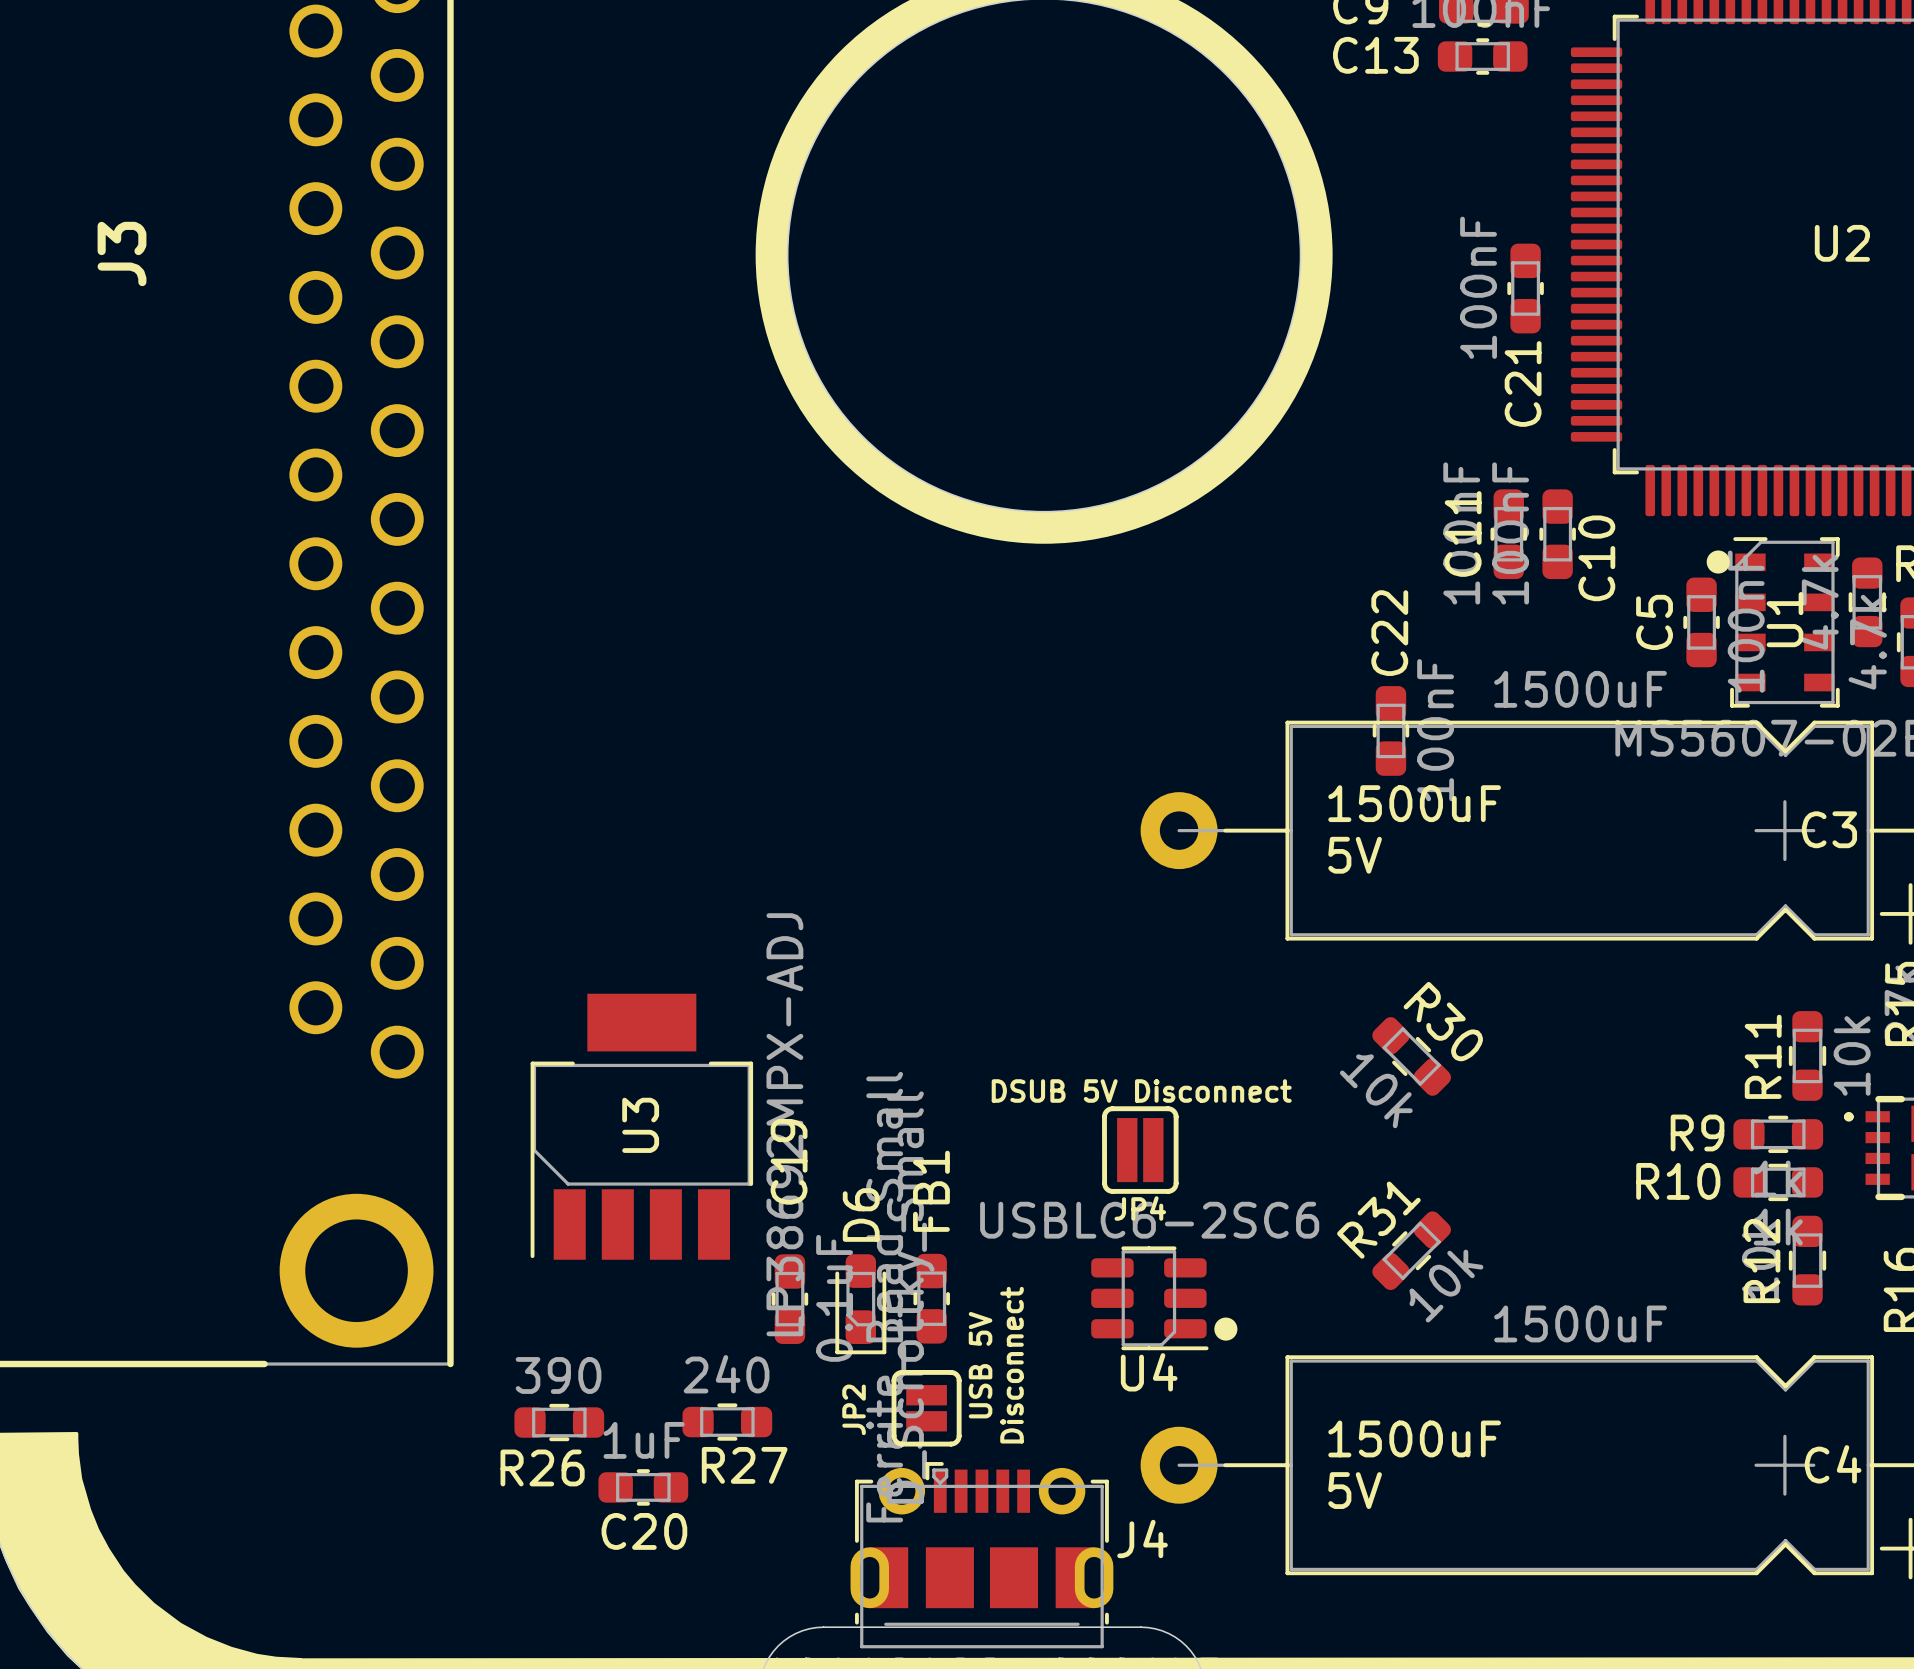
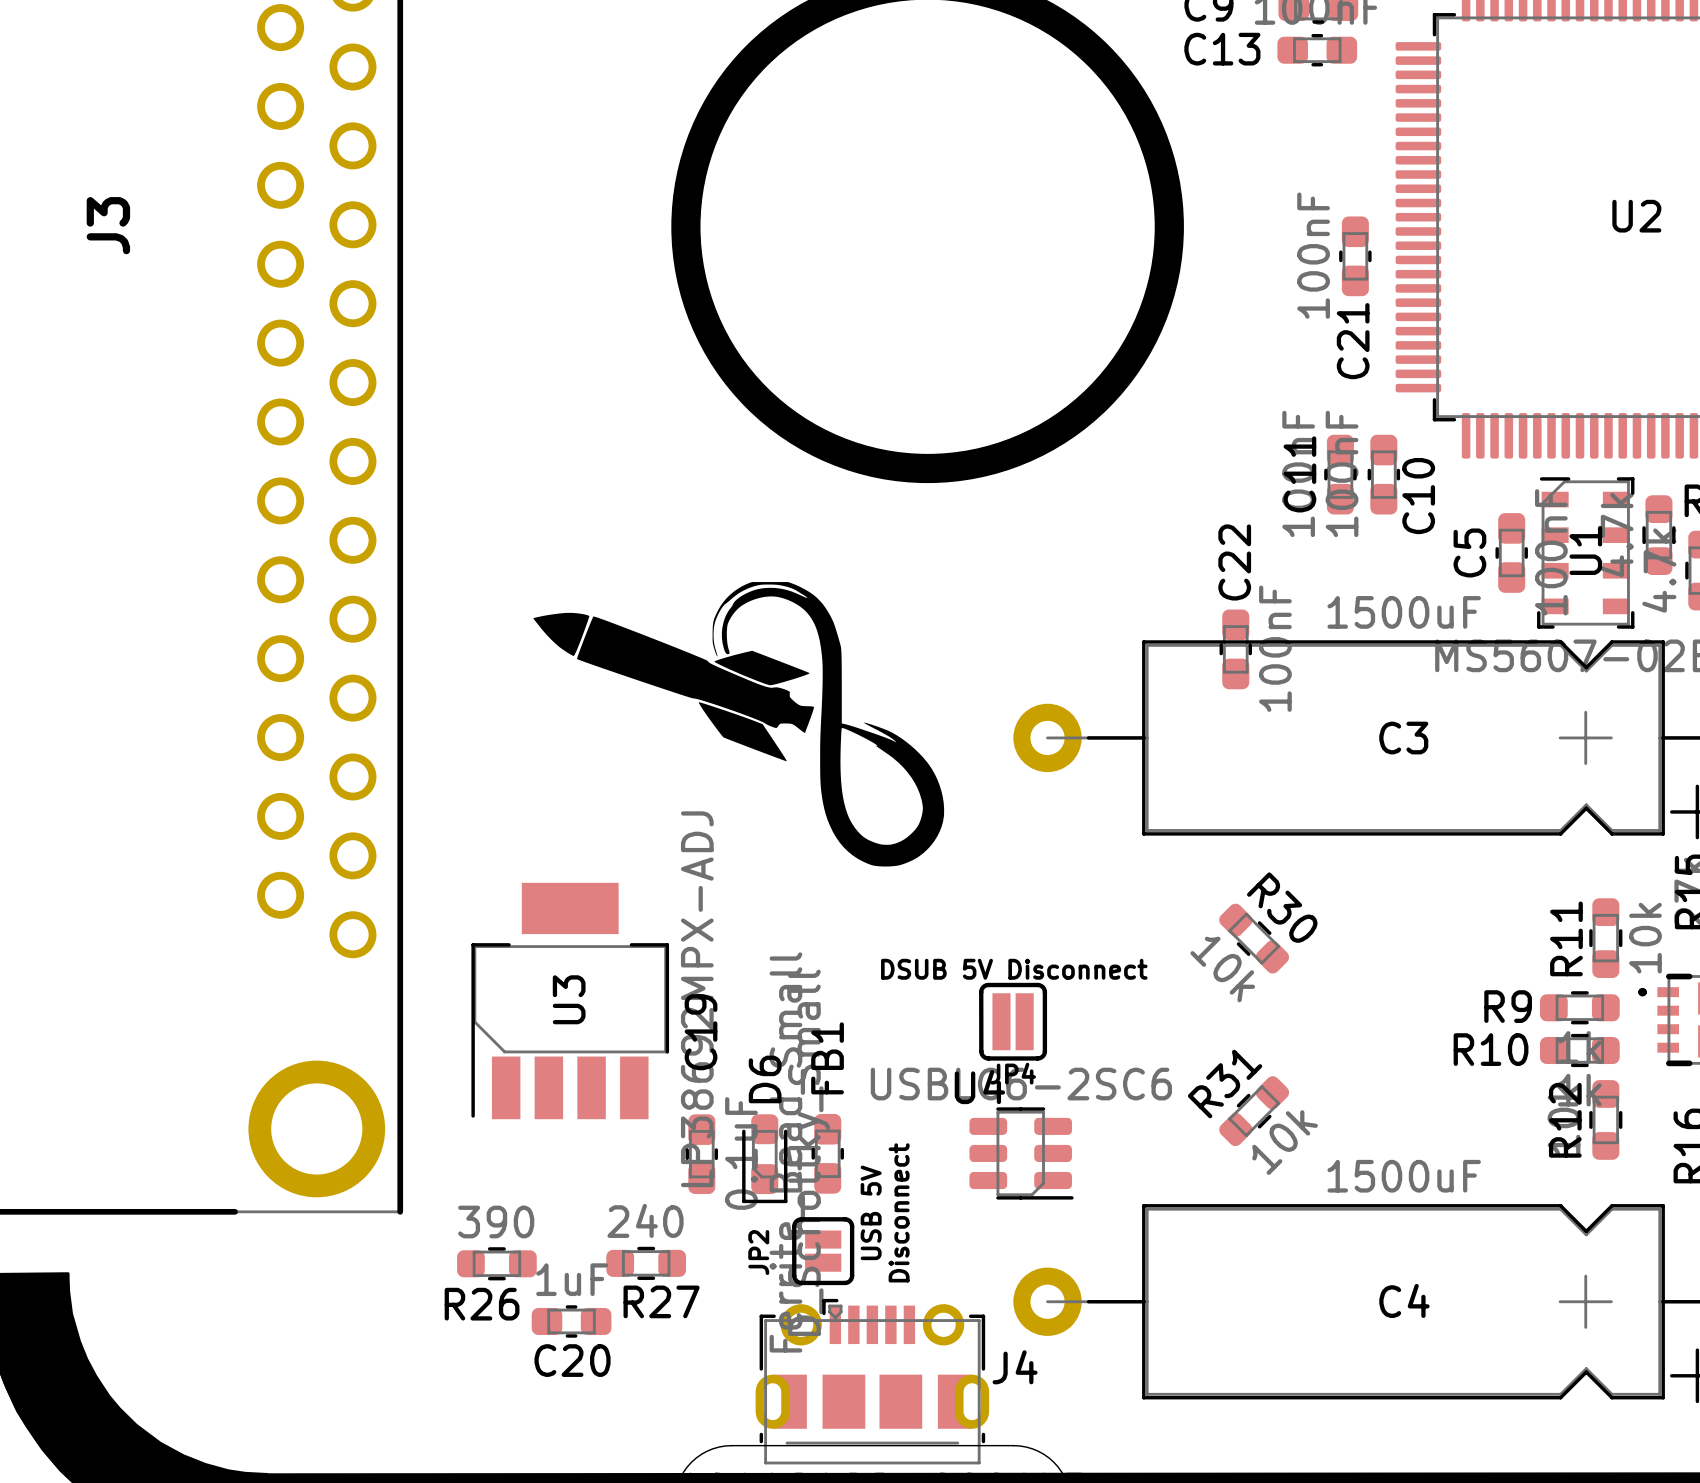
drawing: [1706, 550, 1730, 574] -> none
drawing: none -> [533, 582, 945, 867]
text: 1500uF (1414, 803) -> none
C3 name position: C3 (1829, 829) -> C3 (1403, 738)
text: 5V (1355, 855) -> none
drawing: [1214, 1317, 1238, 1341] -> none
U4 name position: U4 (1149, 1372) -> U4 (979, 1087)
text: 1500uF (1414, 1438) -> none
C4 name position: C4 (1833, 1464) -> C4 (1404, 1300)
text: 5V (1355, 1490) -> none

